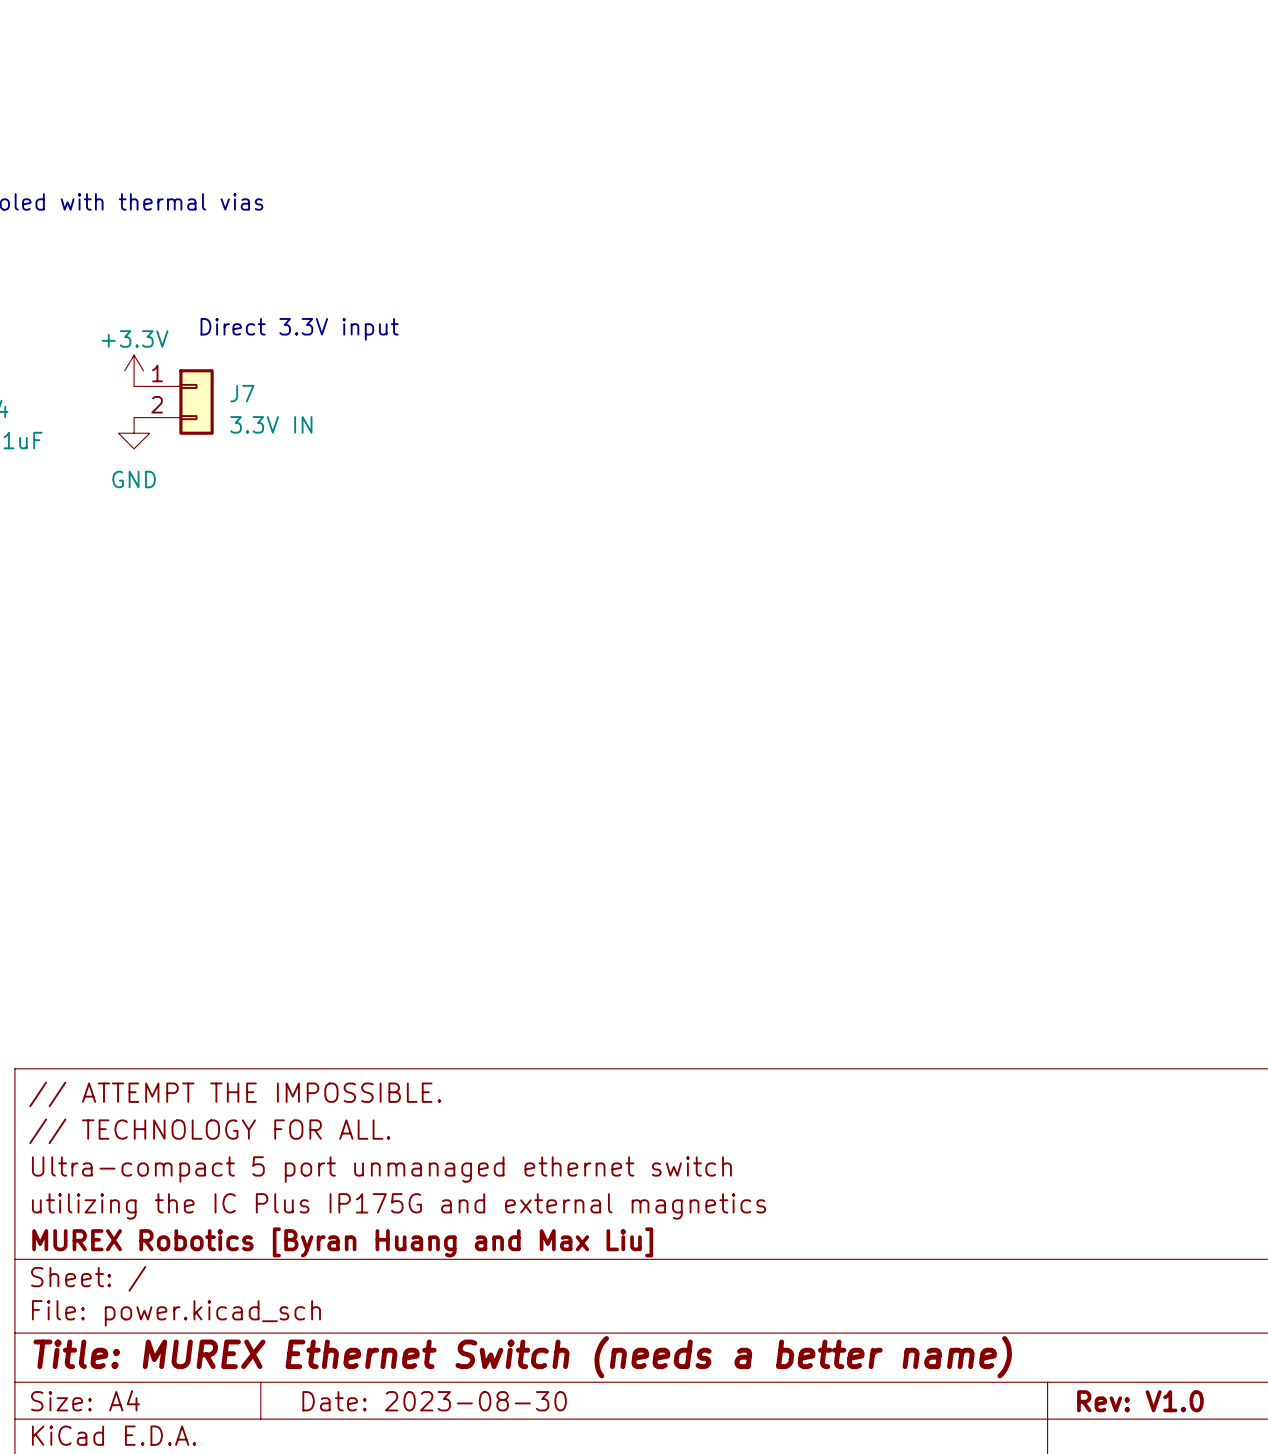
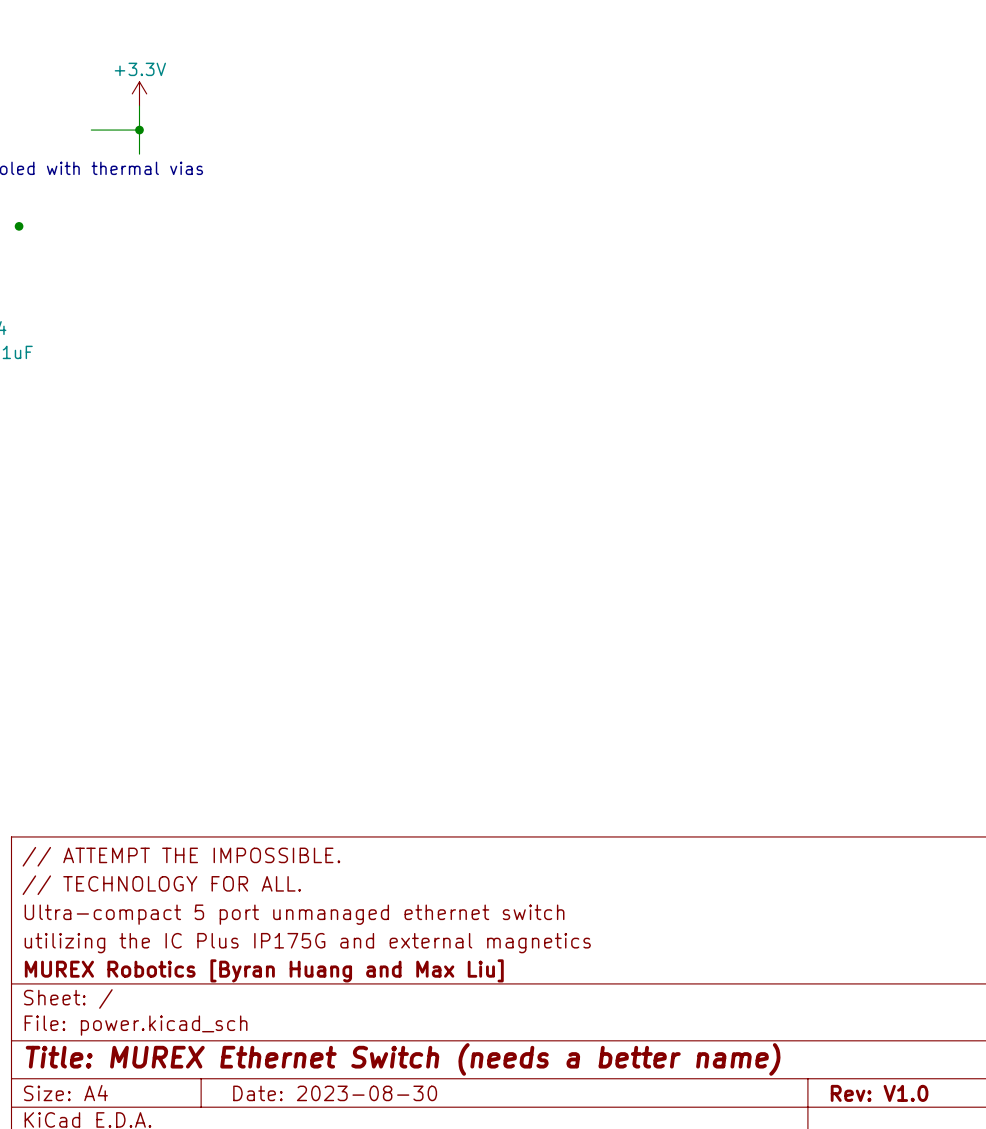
power symbol: none -> +3.3V (139, 93)
wire: none -> (139, 105) (139, 154)
wire: none -> (91, 130) (139, 130)
junction: none -> (139, 130)
junction: none -> (19, 226)
text: Direct 3.3V input (299, 329) -> none
power symbol: +3.3V (134, 370) -> none
J7: 3.3V IN (173, 402) -> none
power symbol: GND (134, 433) -> none

